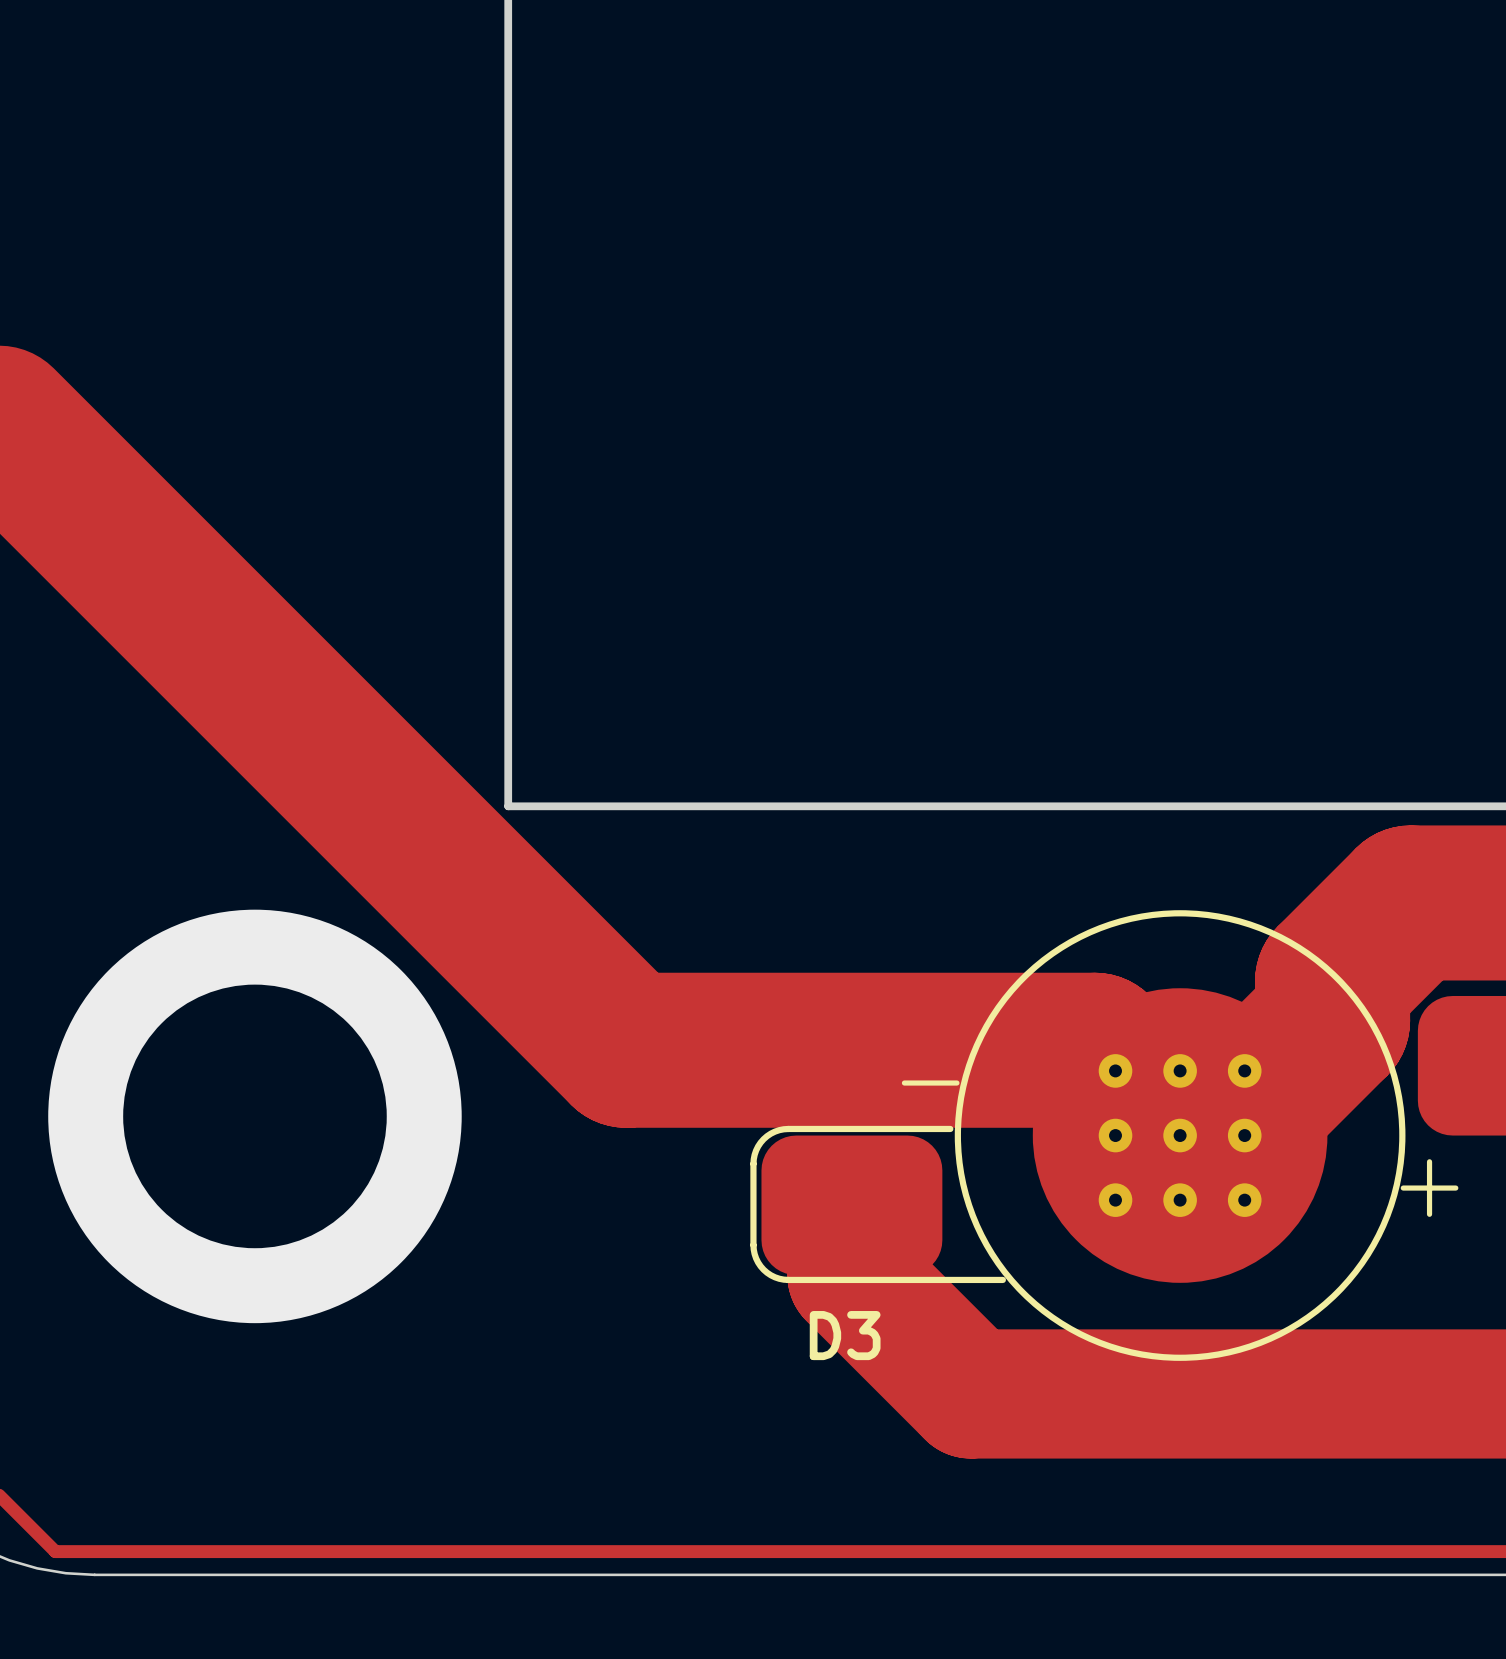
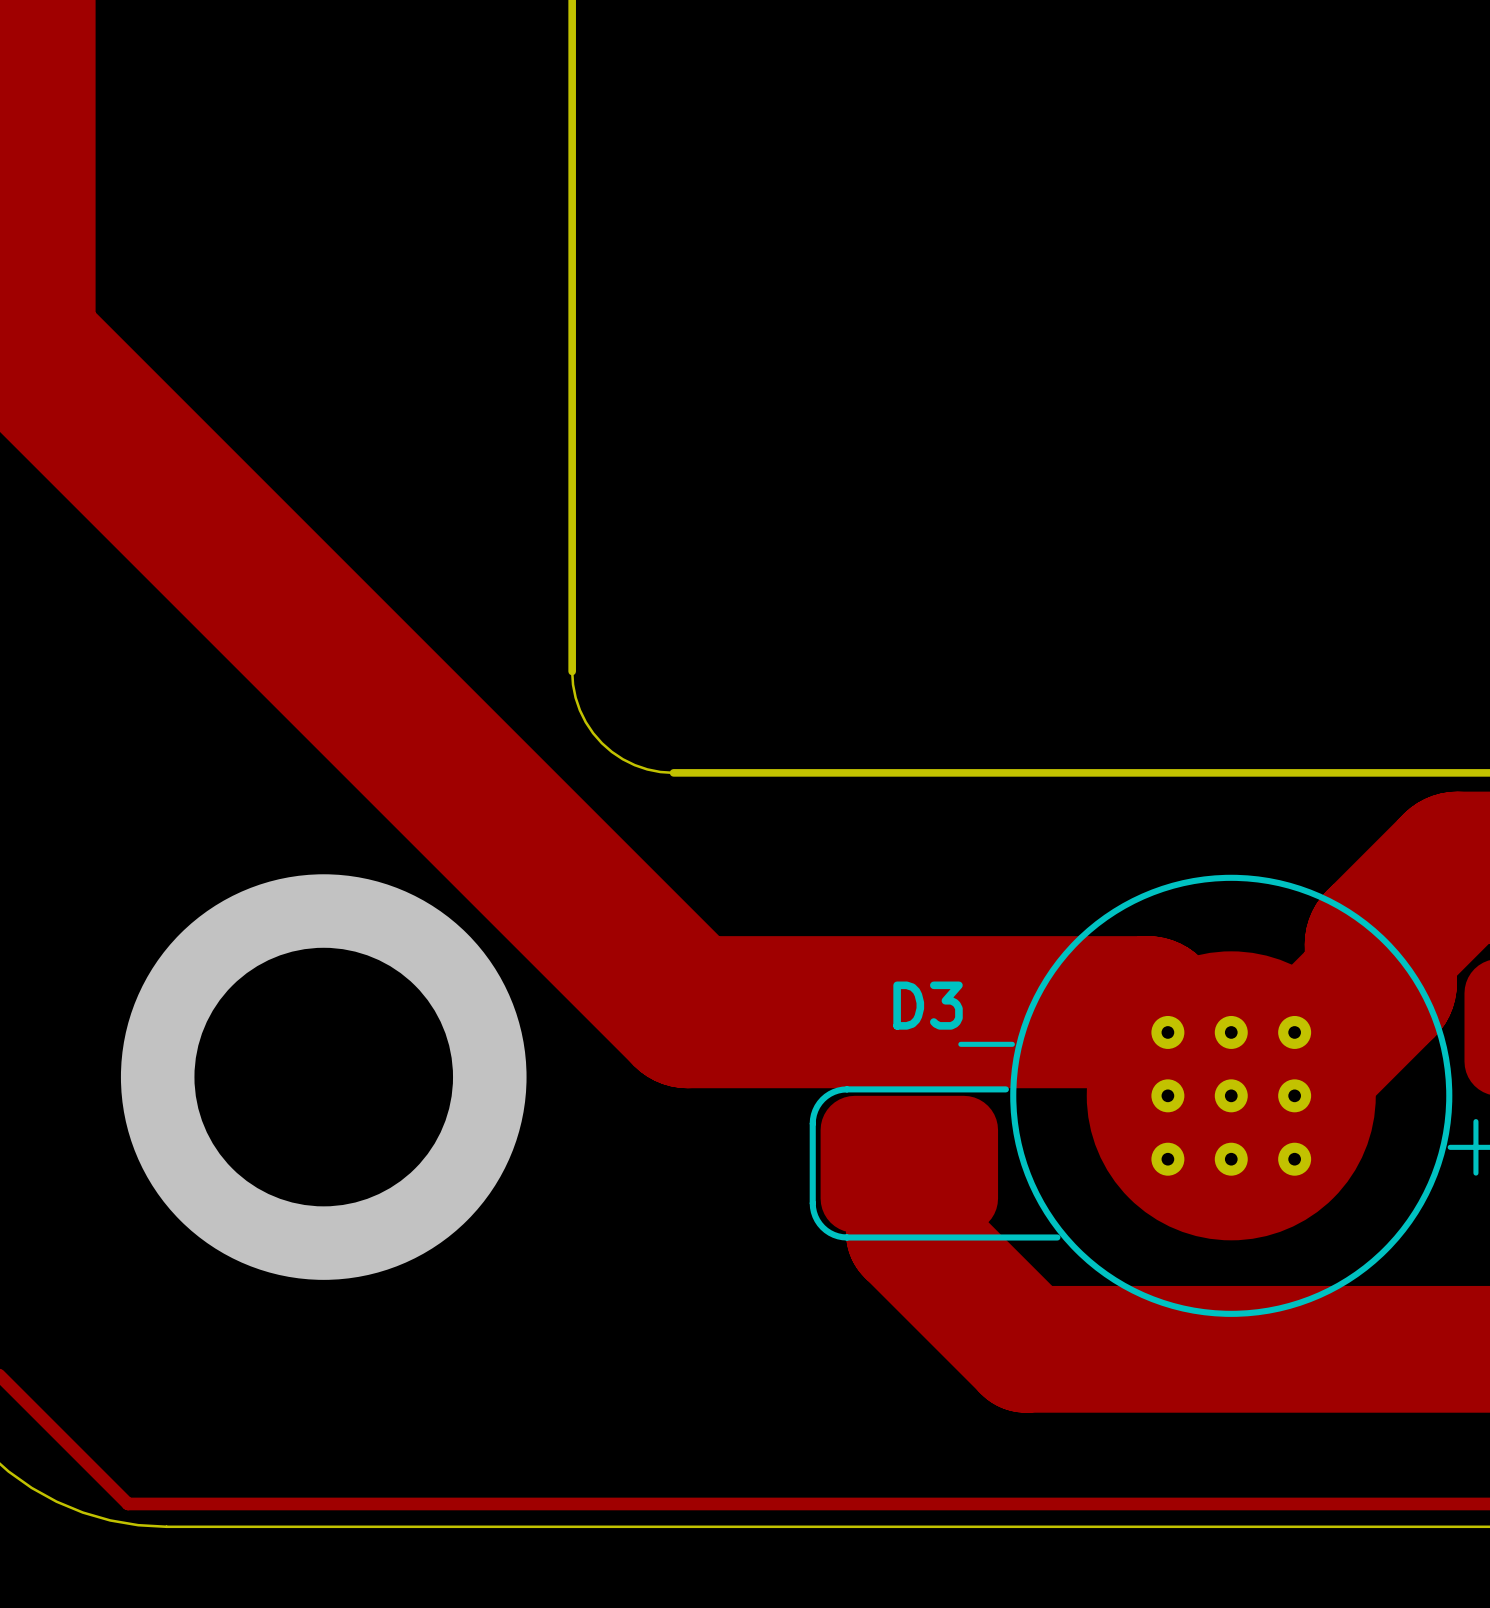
board edge: (508, 702) (508, 806) (611, 806) -> (572, 671) (575, 697) (579, 710) (585, 722) (601, 743) (622, 759) (634, 765) (647, 769) (673, 772)
D3 name position: D3 (845, 1335) -> D3 (928, 1005)

